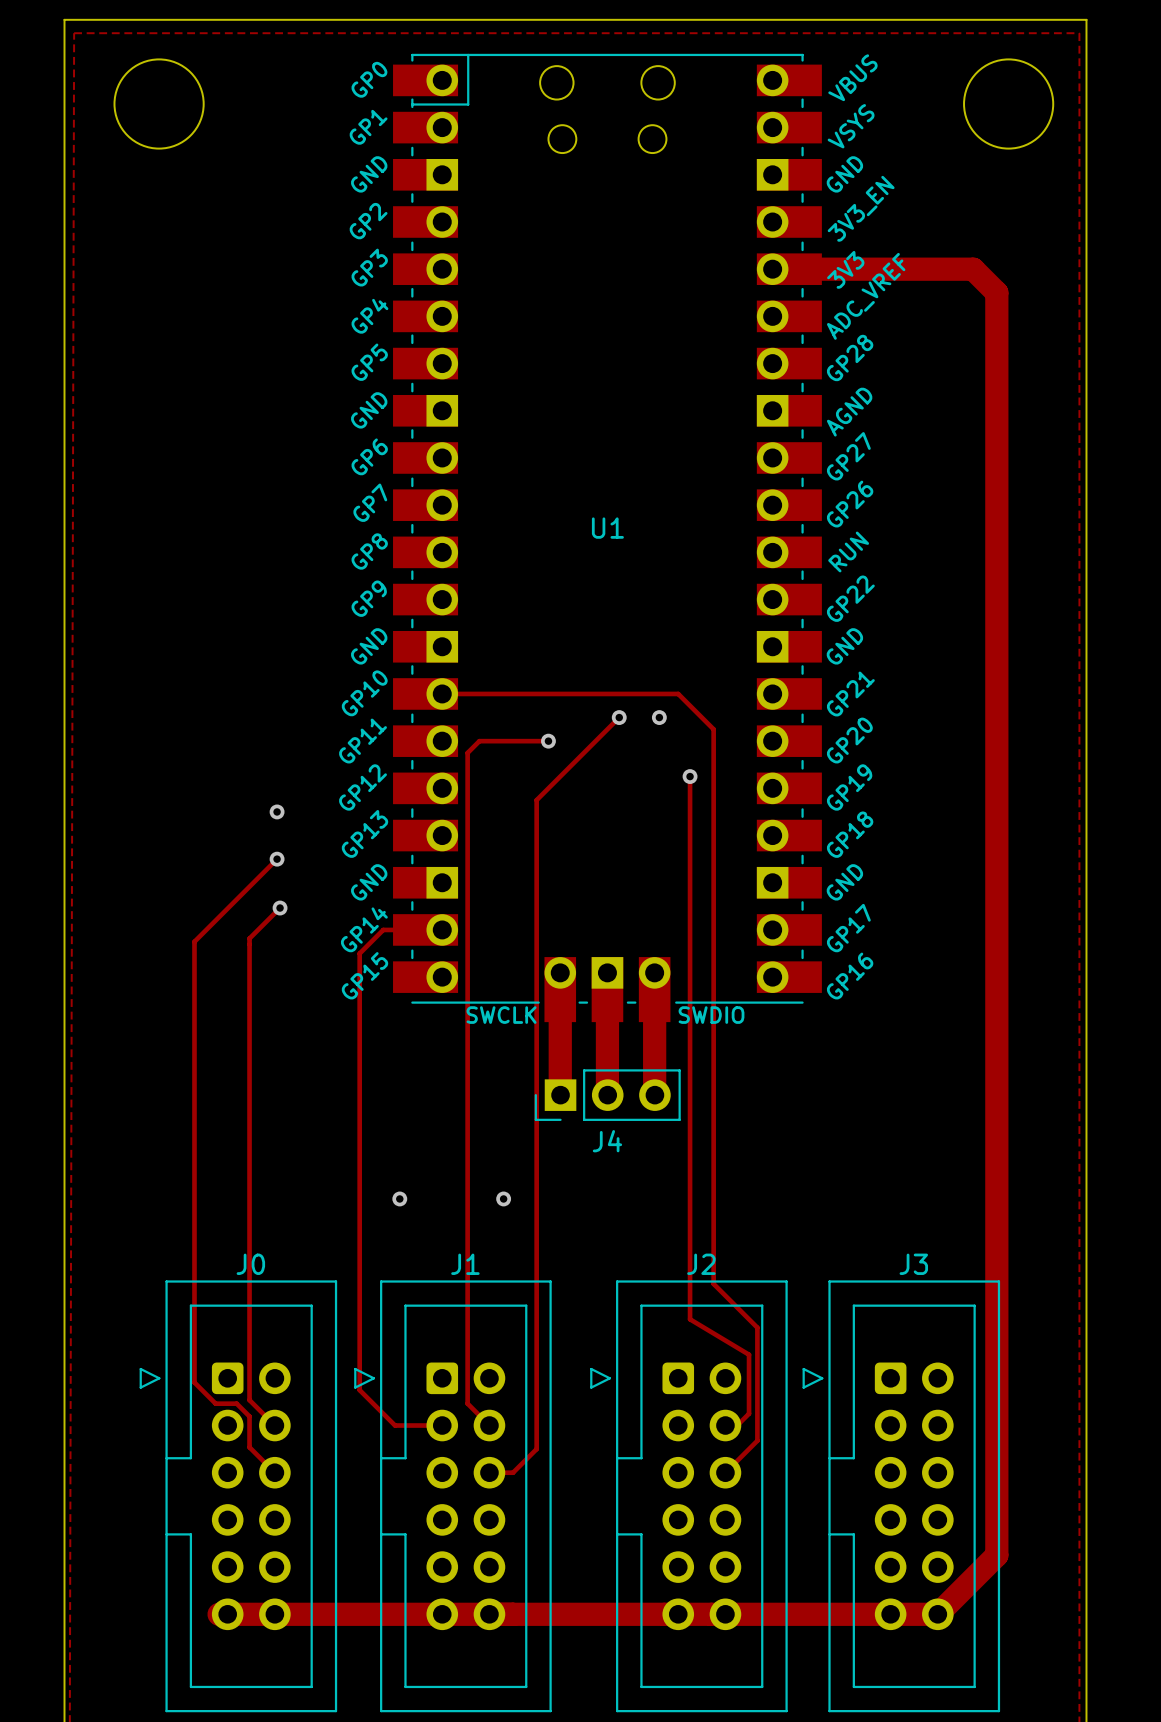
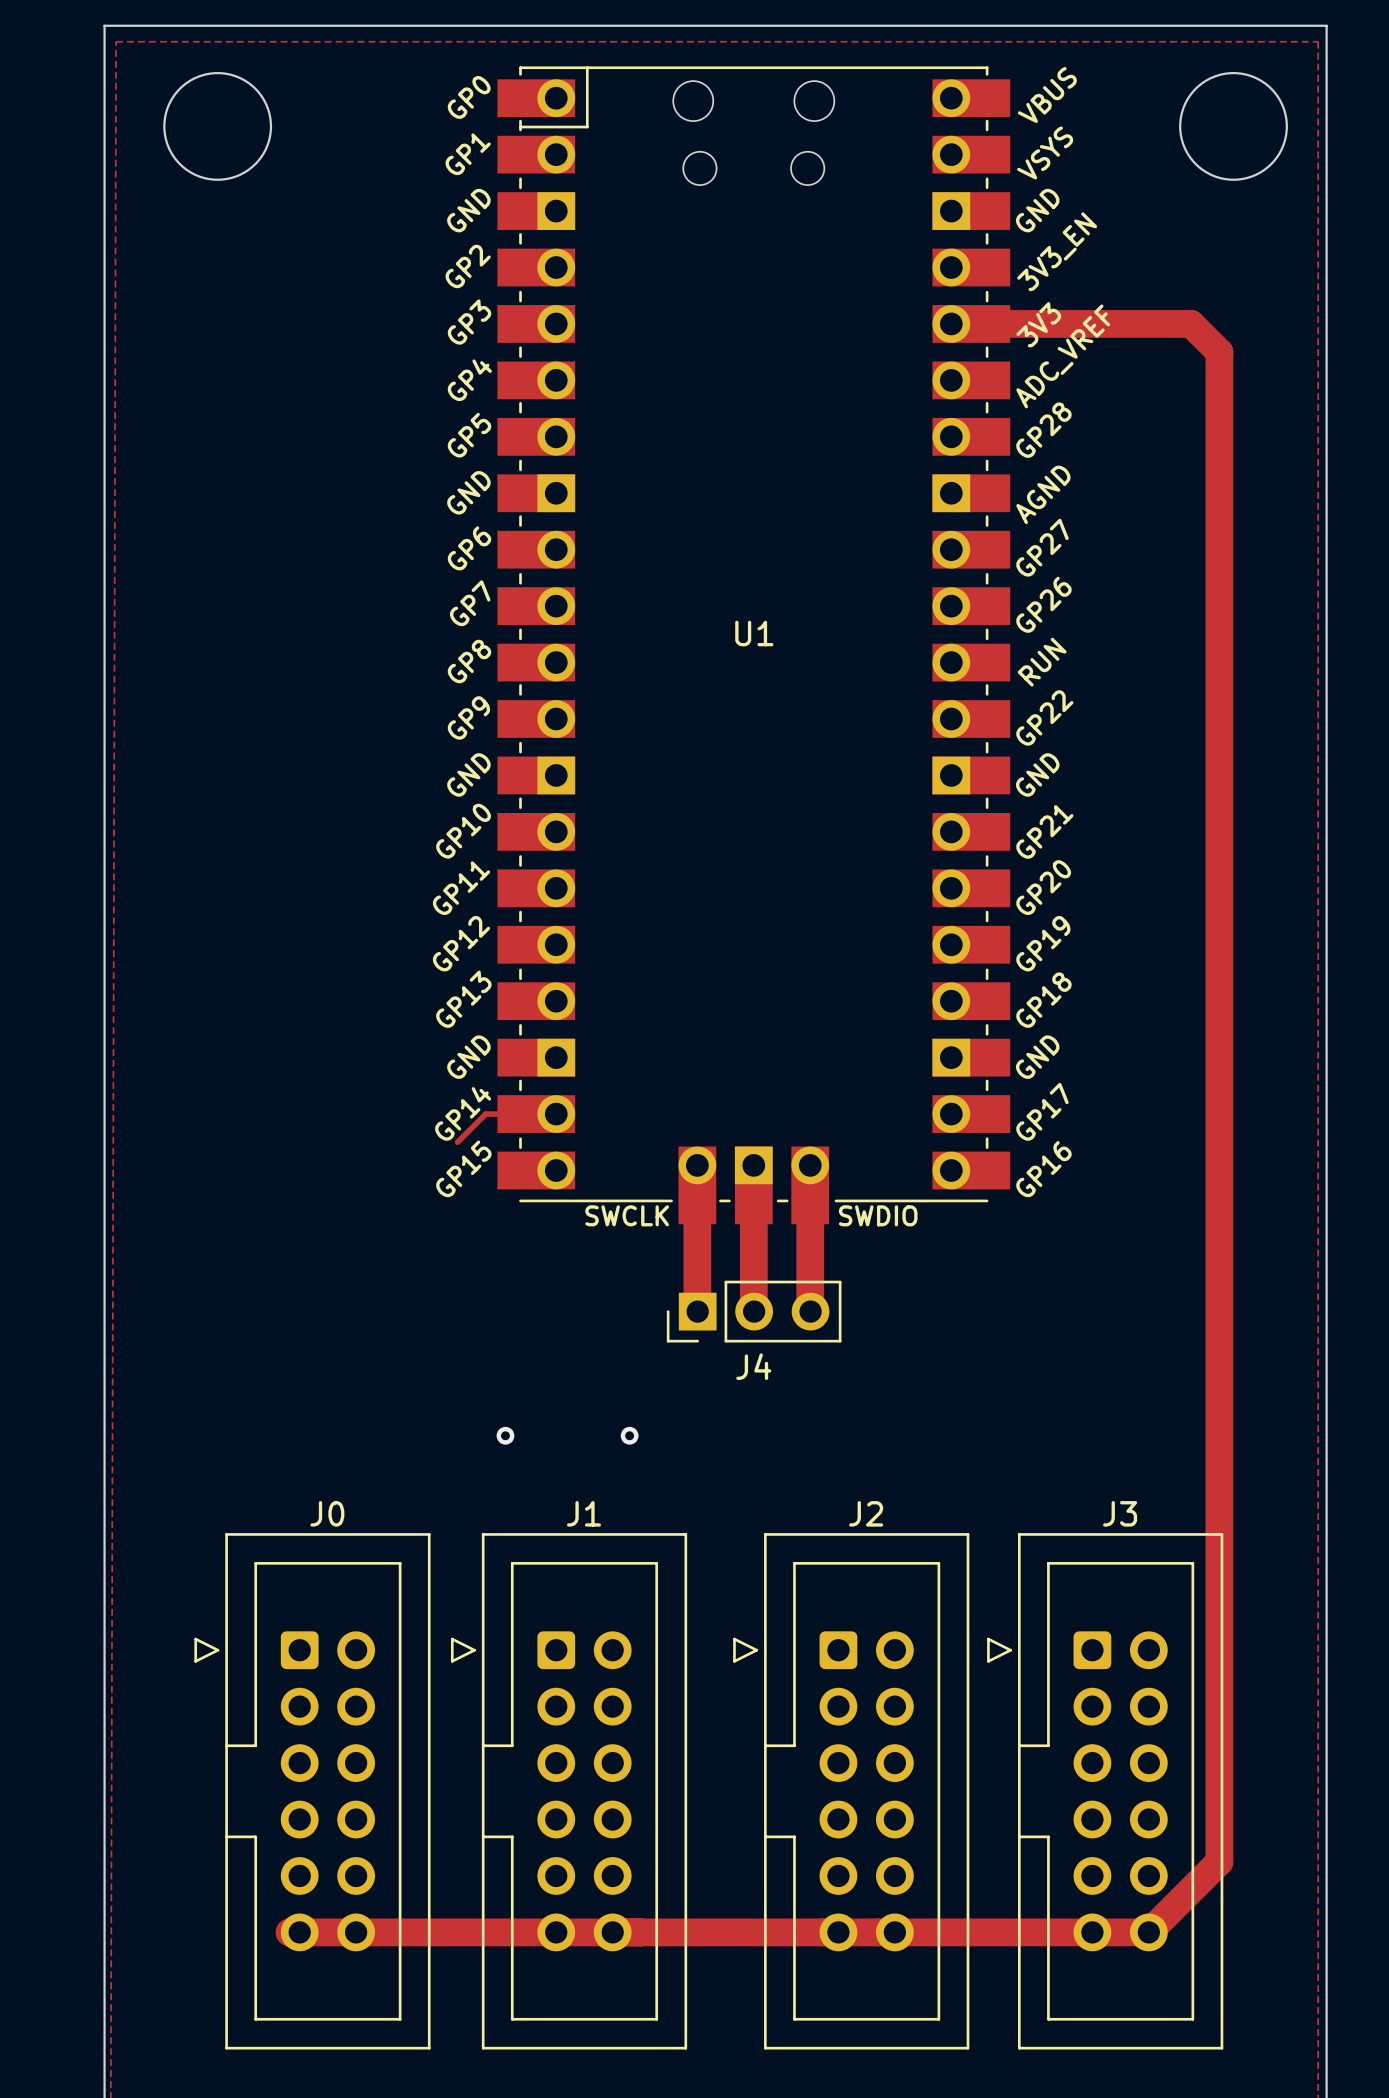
track: (442, 693) (678, 693) (713, 729) (713, 1283) (757, 1327) (757, 1440) (725, 1472) -> none
track: (619, 717) (536, 800) (536, 1449) (513, 1472) (489, 1472) -> none
via: (619, 717) -> none
via: (659, 717) -> none
track: (548, 741) (479, 741) (467, 752) (467, 1403) (489, 1425) -> none
via: (548, 741) -> none
track: (690, 776) (690, 1319) (749, 1354) (749, 1413) (737, 1425) -> none
via: (690, 776) -> none
via: (277, 811) -> none
track: (277, 859) (194, 941) (194, 1382) (215, 1403) (236, 1403) (249, 1416) (249, 1447) (274, 1472) -> none
via: (277, 859) -> none
track: (280, 908) (249, 938) (249, 1400) (274, 1425) -> none
via: (280, 908) -> none
track: (359, 953) (359, 1390) (395, 1425) (442, 1425) -> none

